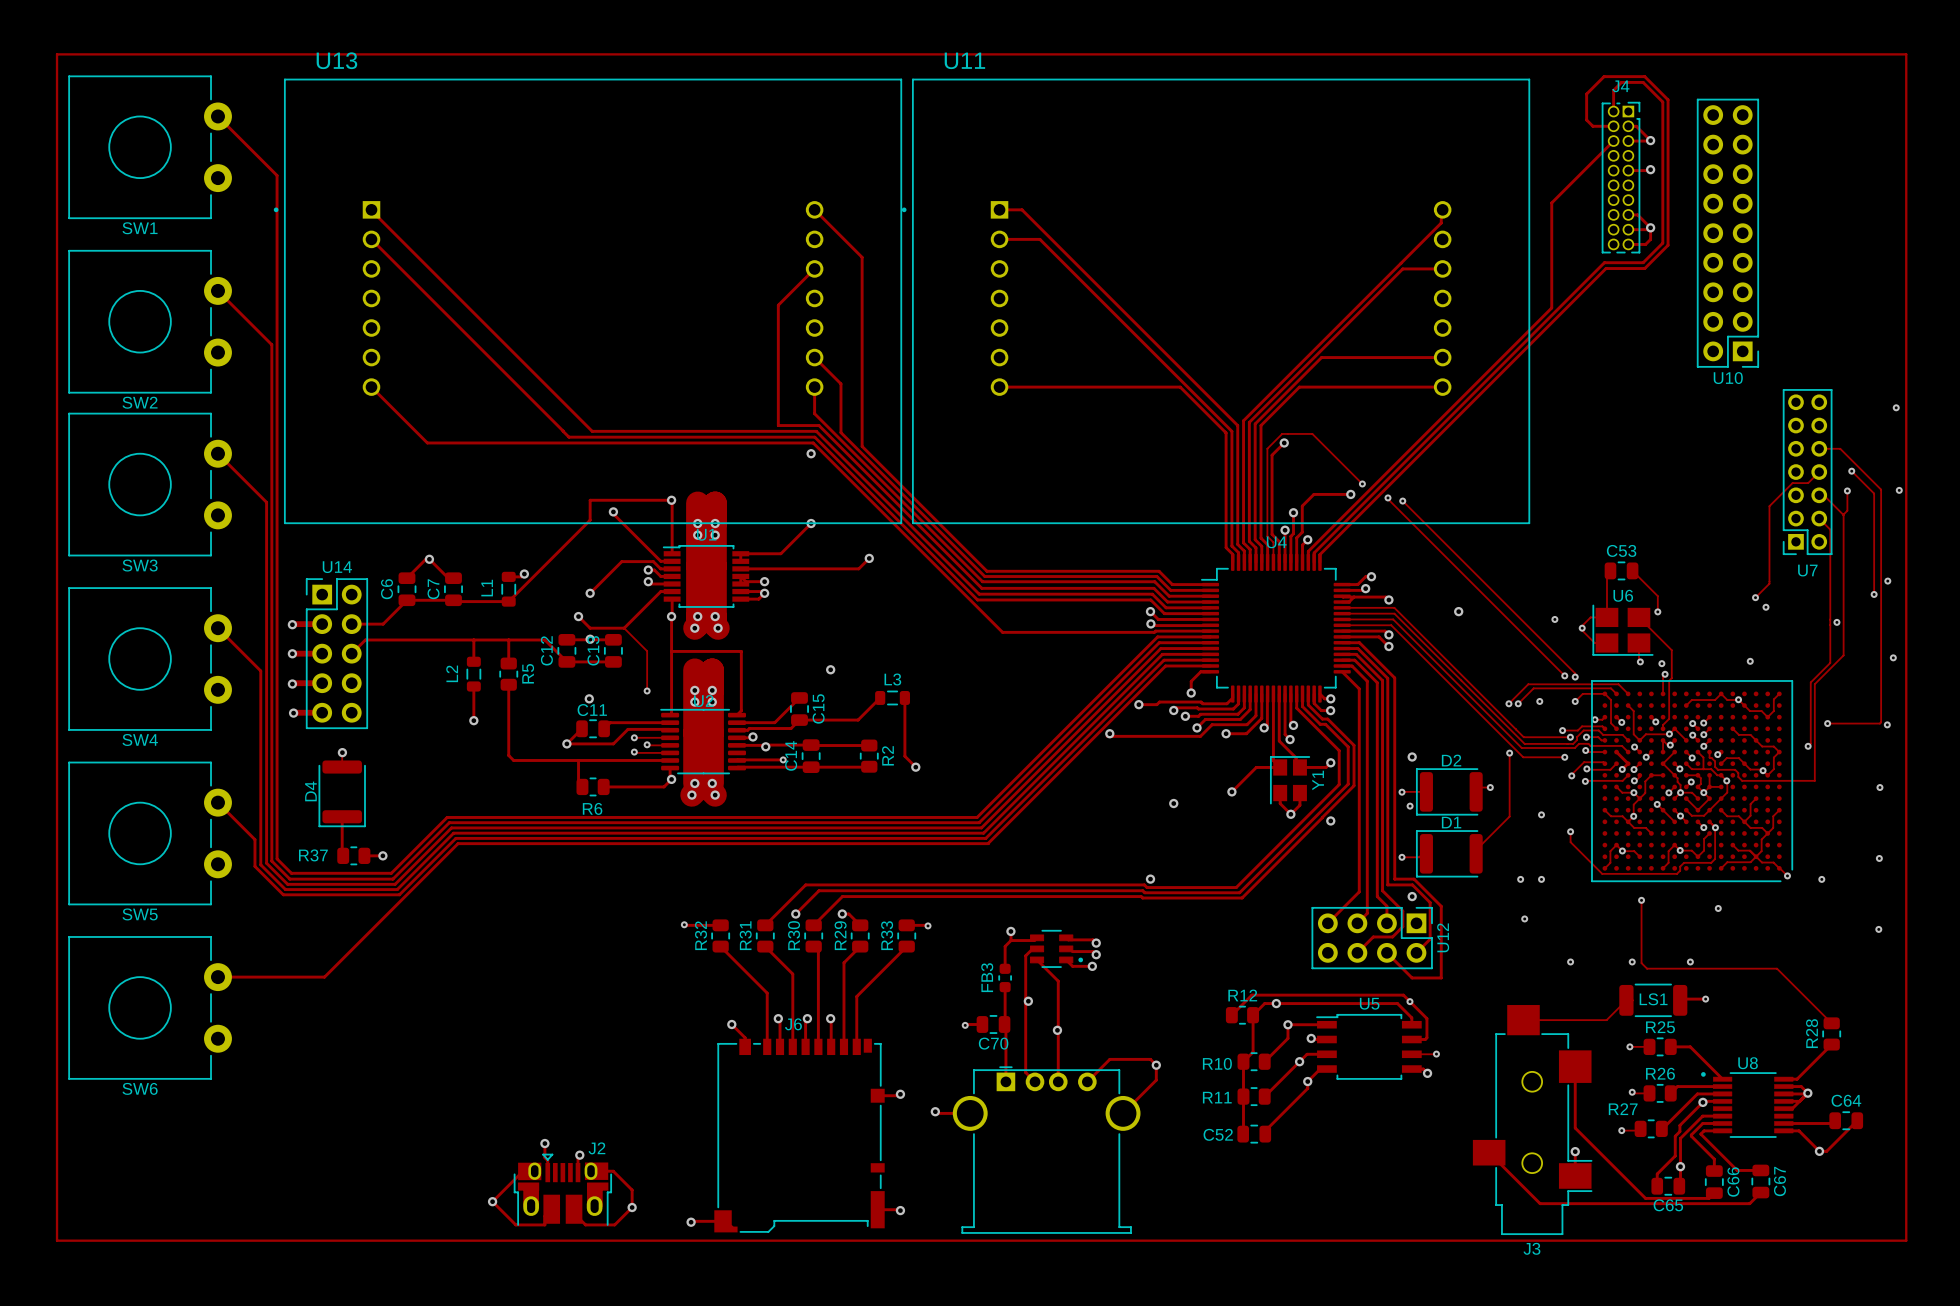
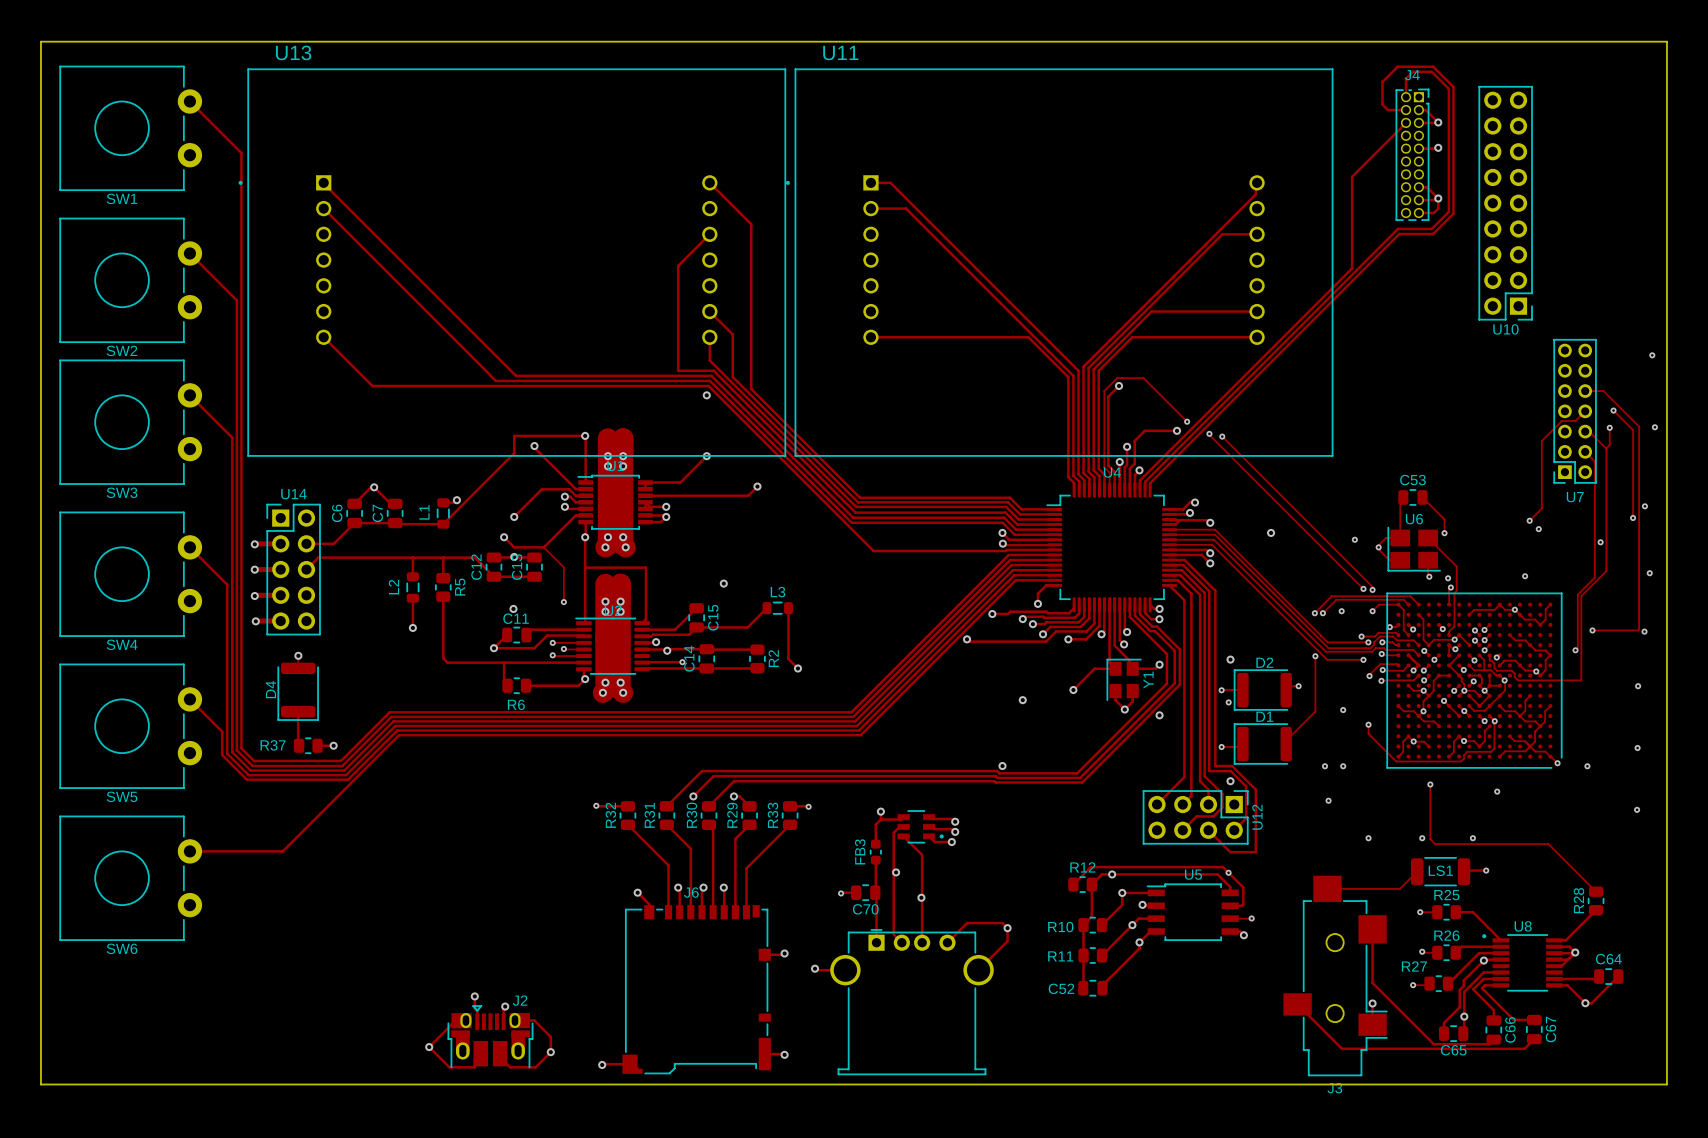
board edge: none -> (40, 41) (1666, 41) (1666, 1084) (40, 1084) (40, 41)
track: (57, 54) (1906, 54) (1906, 1240) (57, 1240) (57, 54) -> none

